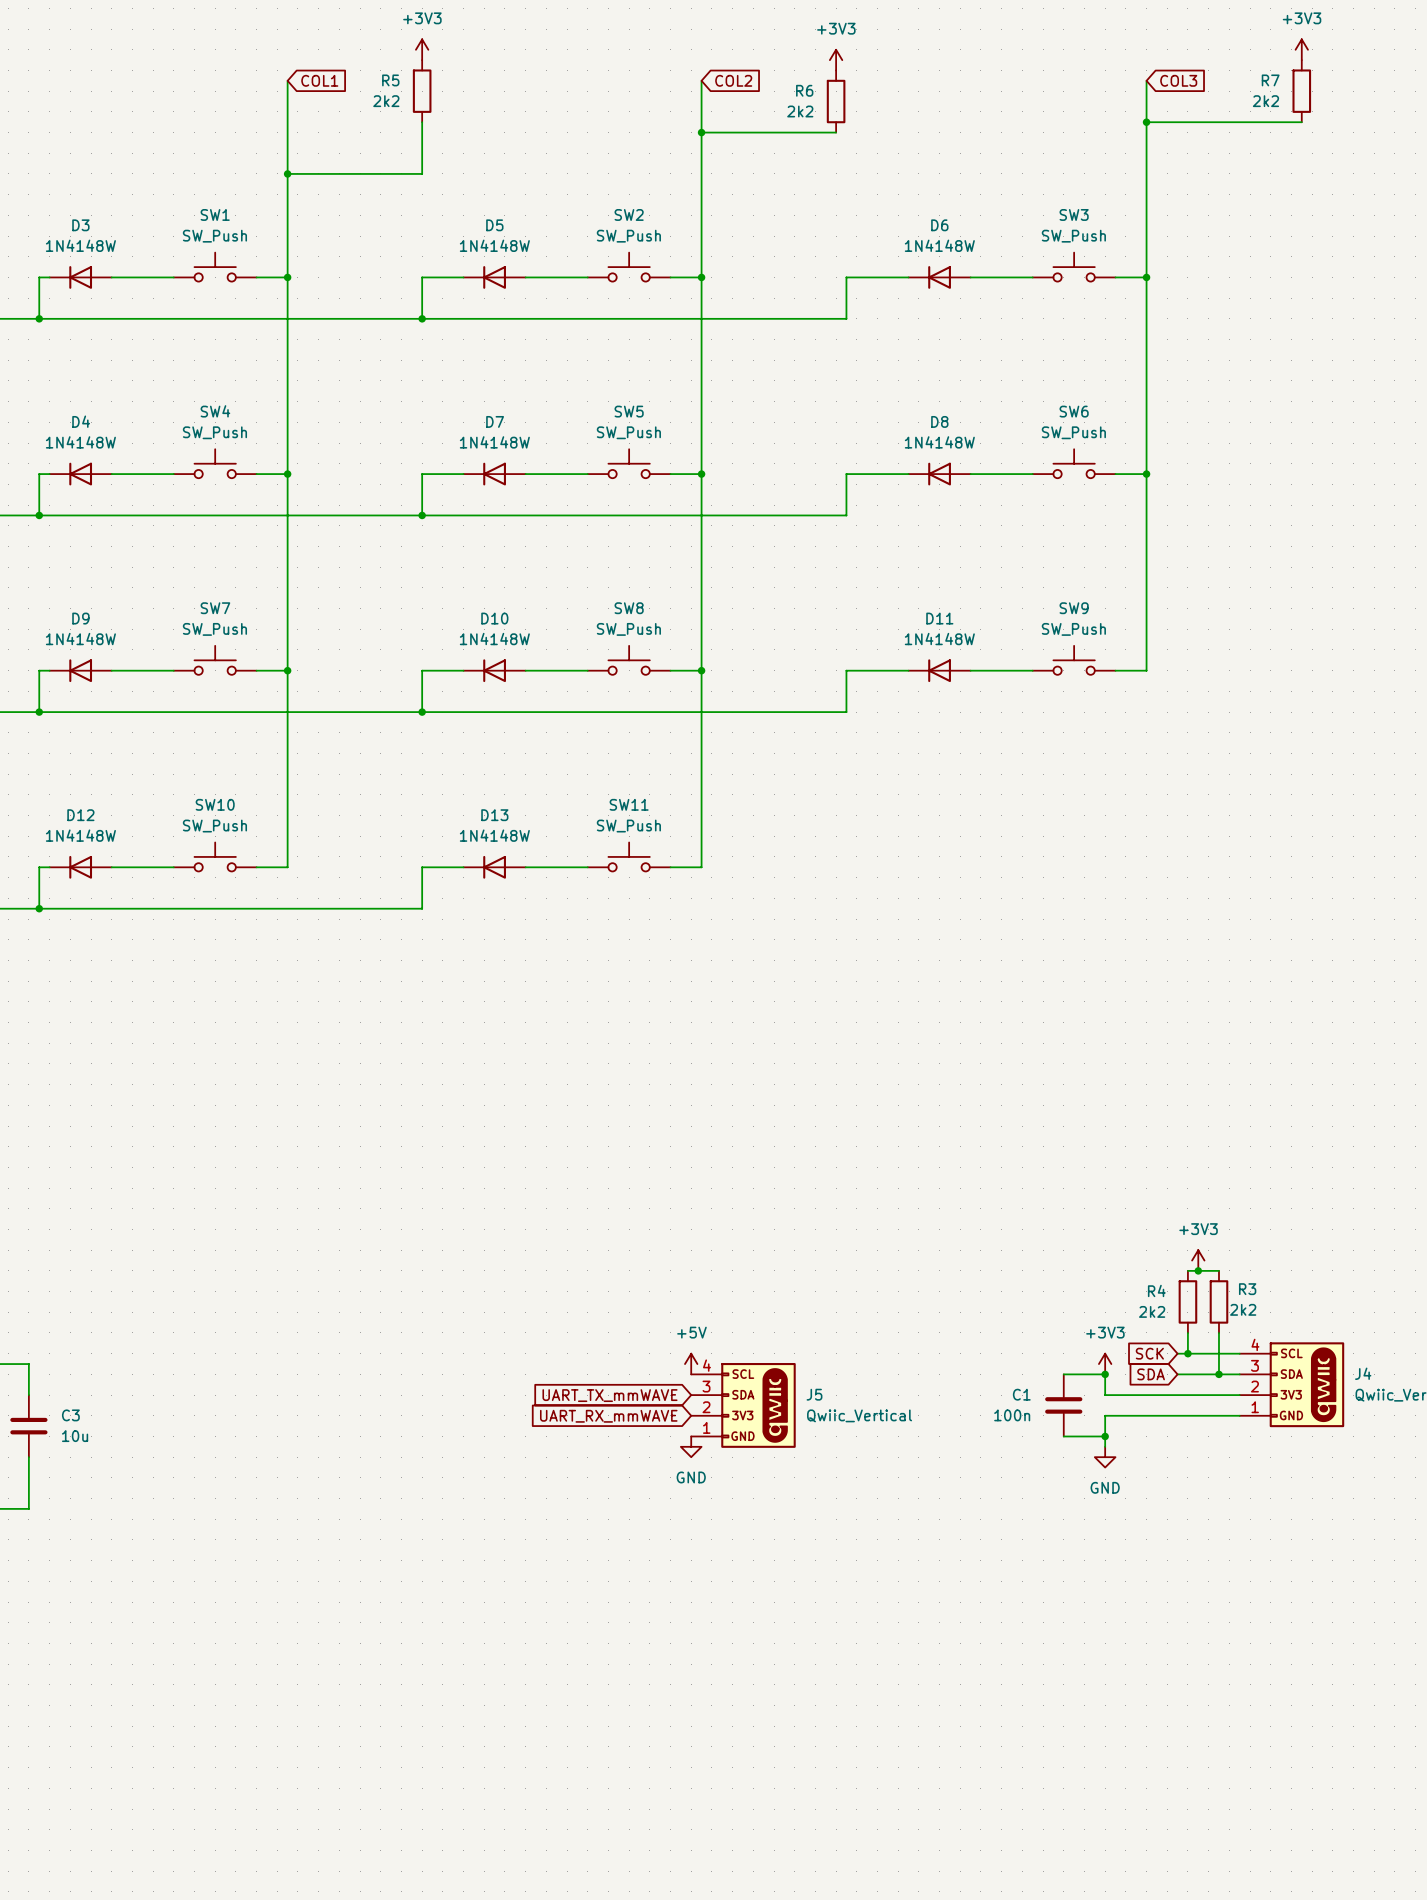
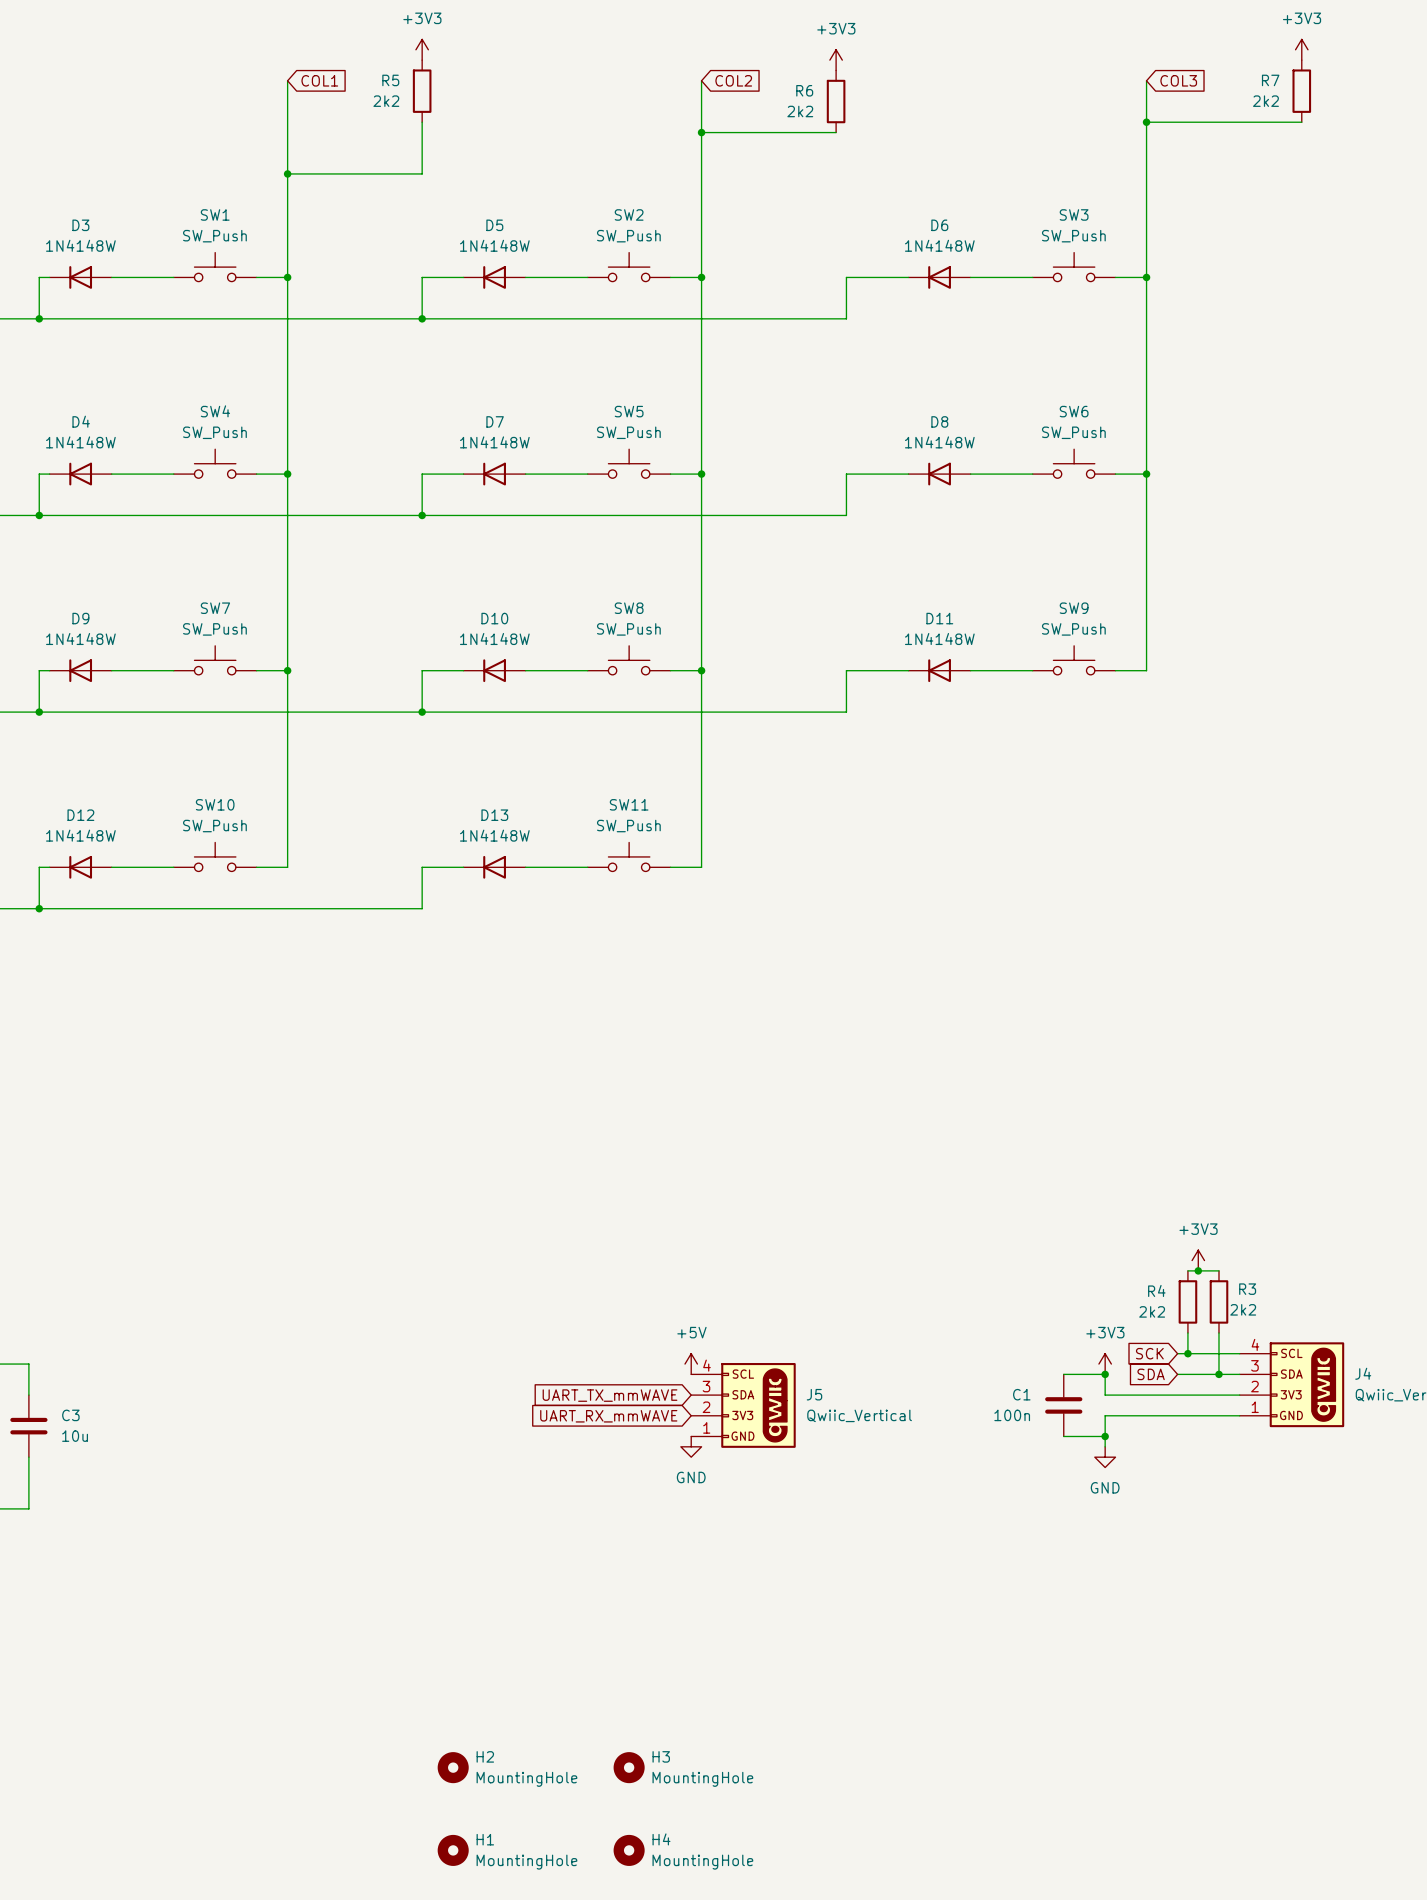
H2: none -> MountingHole (453, 1767)
H3: none -> MountingHole (629, 1767)
H1: none -> MountingHole (453, 1850)
H4: none -> MountingHole (629, 1850)

